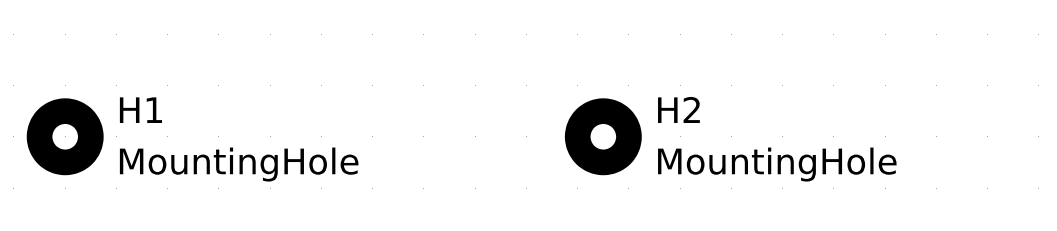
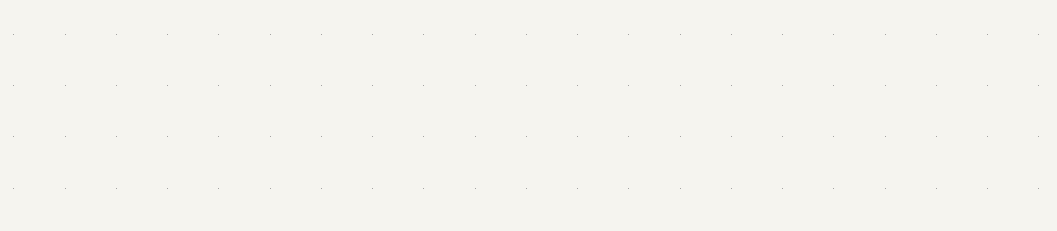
H1: MountingHole (65, 136) -> none
H2: MountingHole (603, 136) -> none

